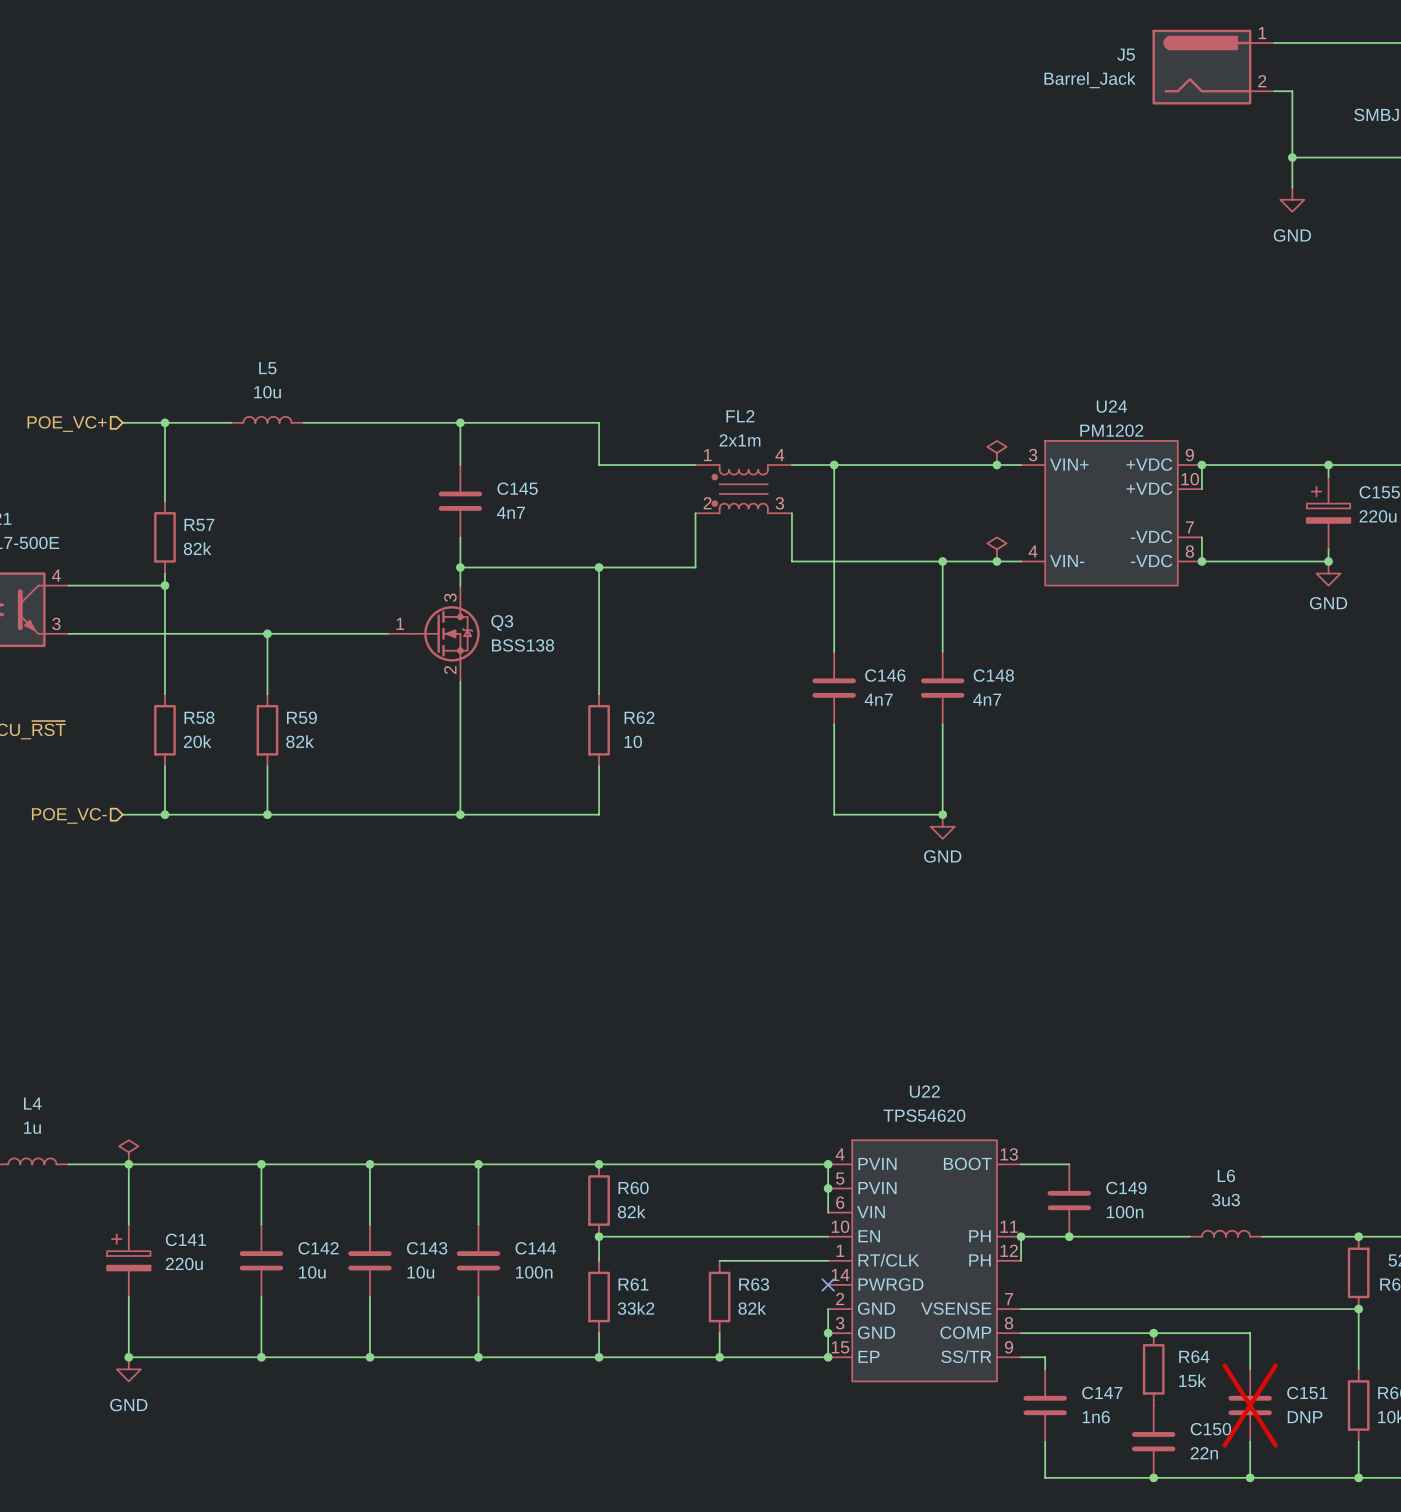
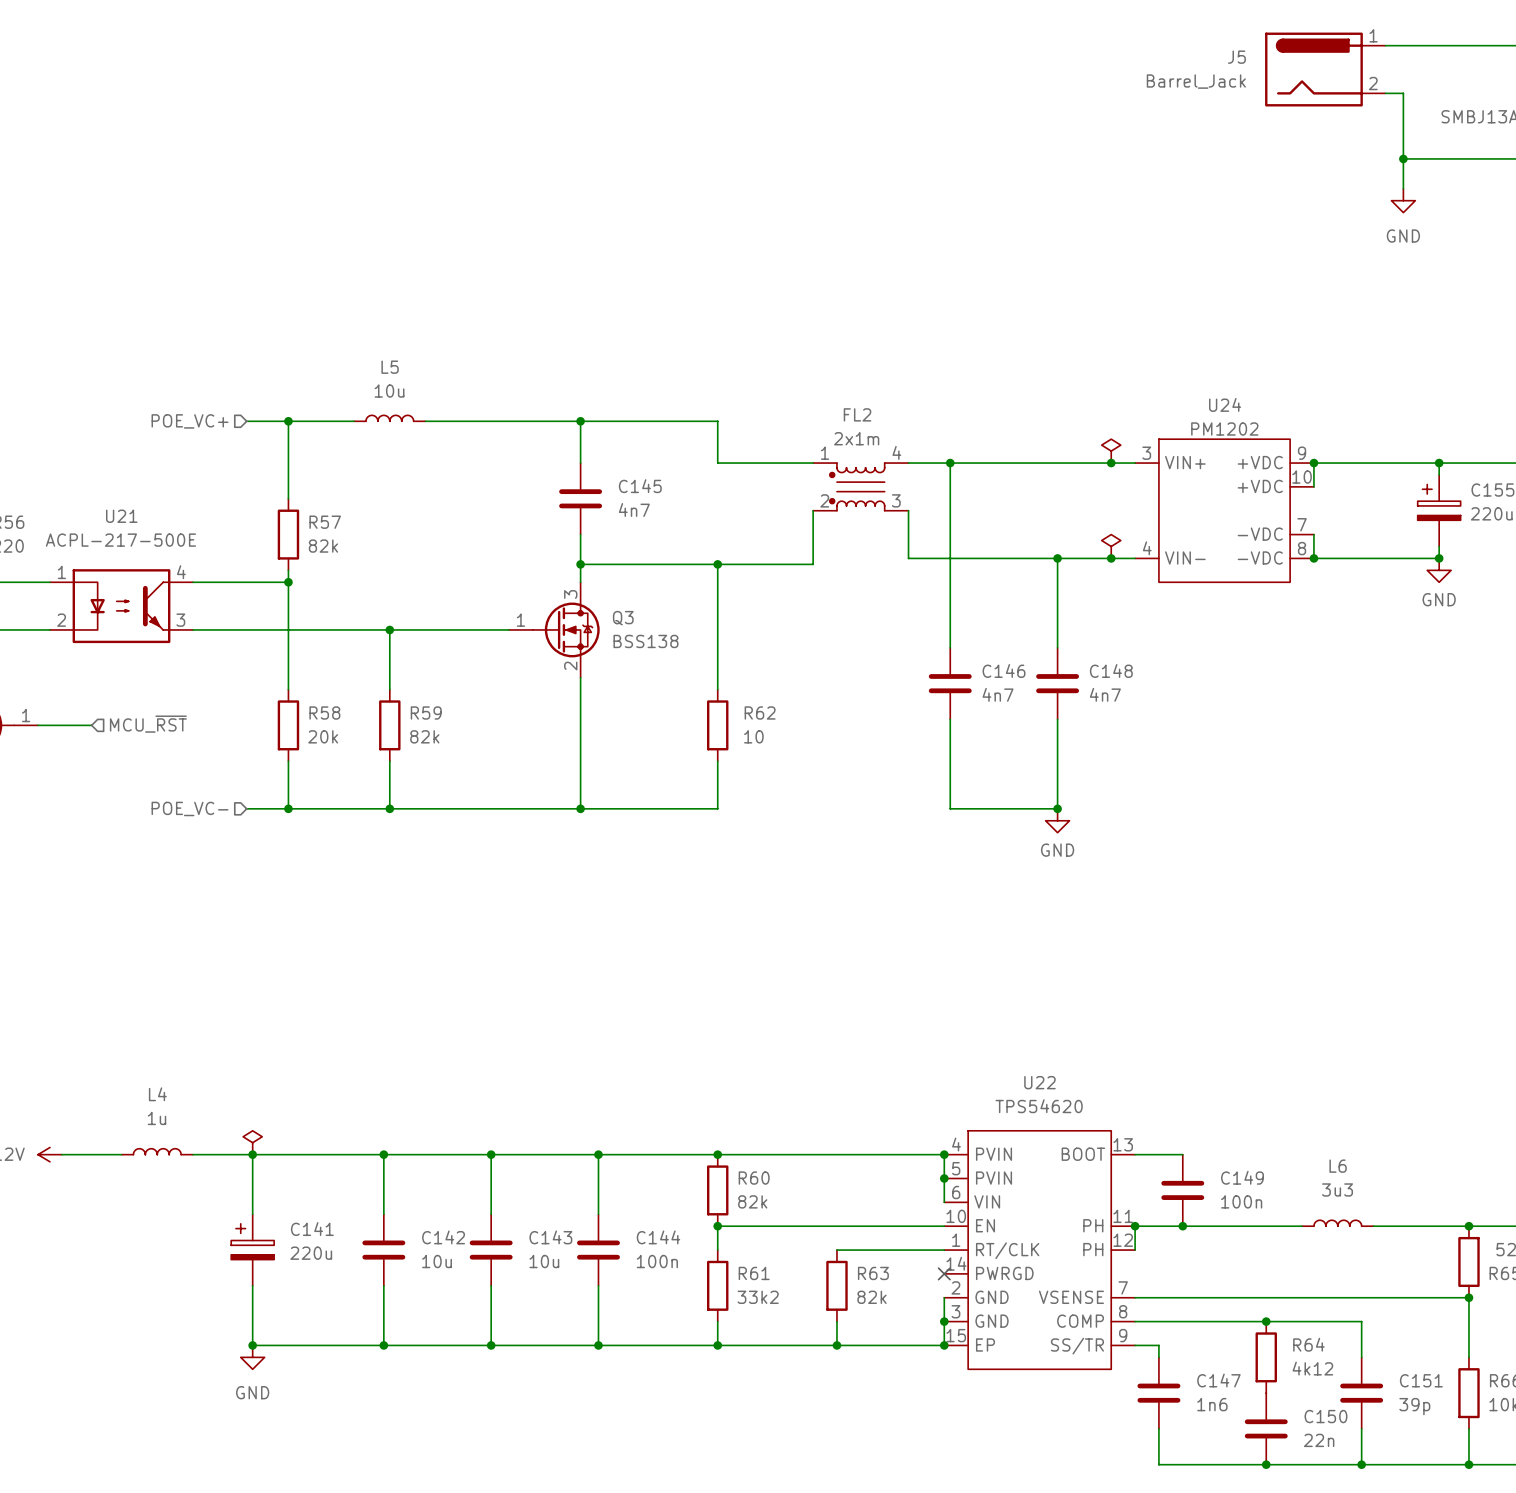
R64 value: 15k (1192, 1380) -> 4k12 (1312, 1368)
C151 do-not-place cross: (1250, 1405) -> none
C151 value: DNP (1305, 1417) -> 39p (1414, 1406)

